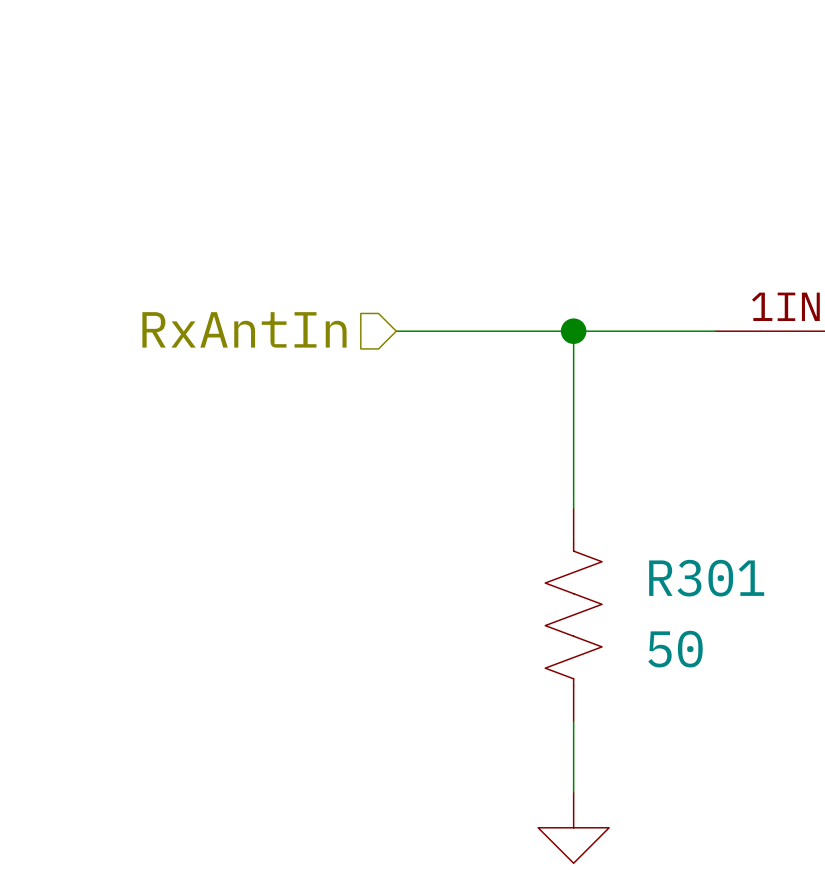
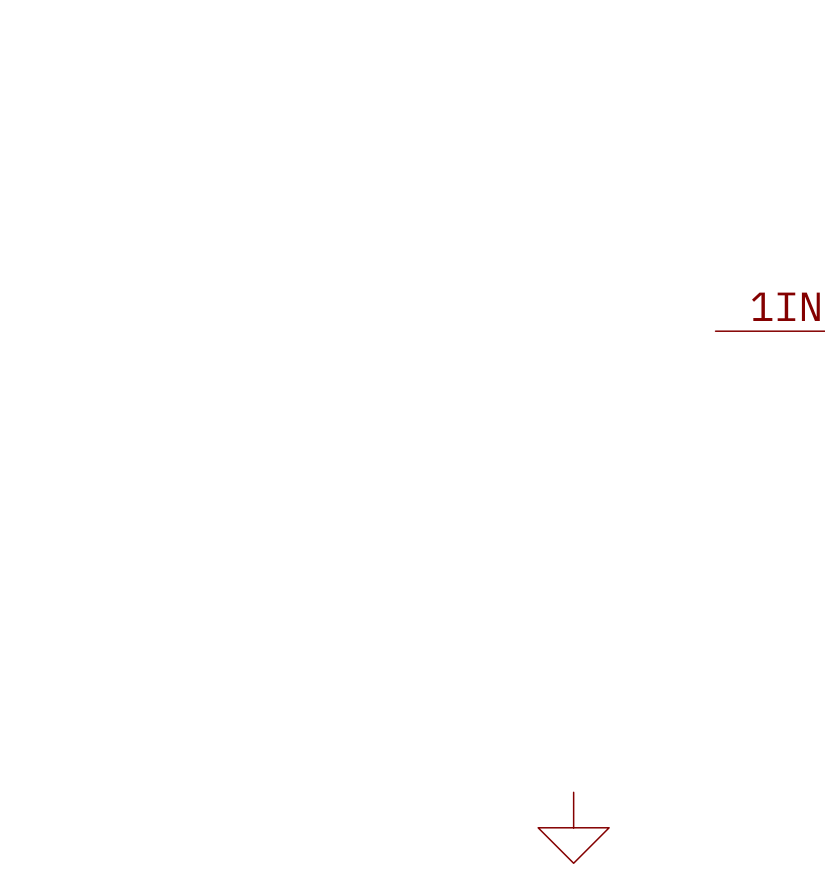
hierarchical label: RxAntIn (244, 329) -> none
wire: (396, 331) (715, 331) -> none
wire: (573, 331) (573, 508) -> none
junction: (573, 331) -> none
R301: 50 (573, 614) -> none
wire: (573, 721) (573, 792) -> none

